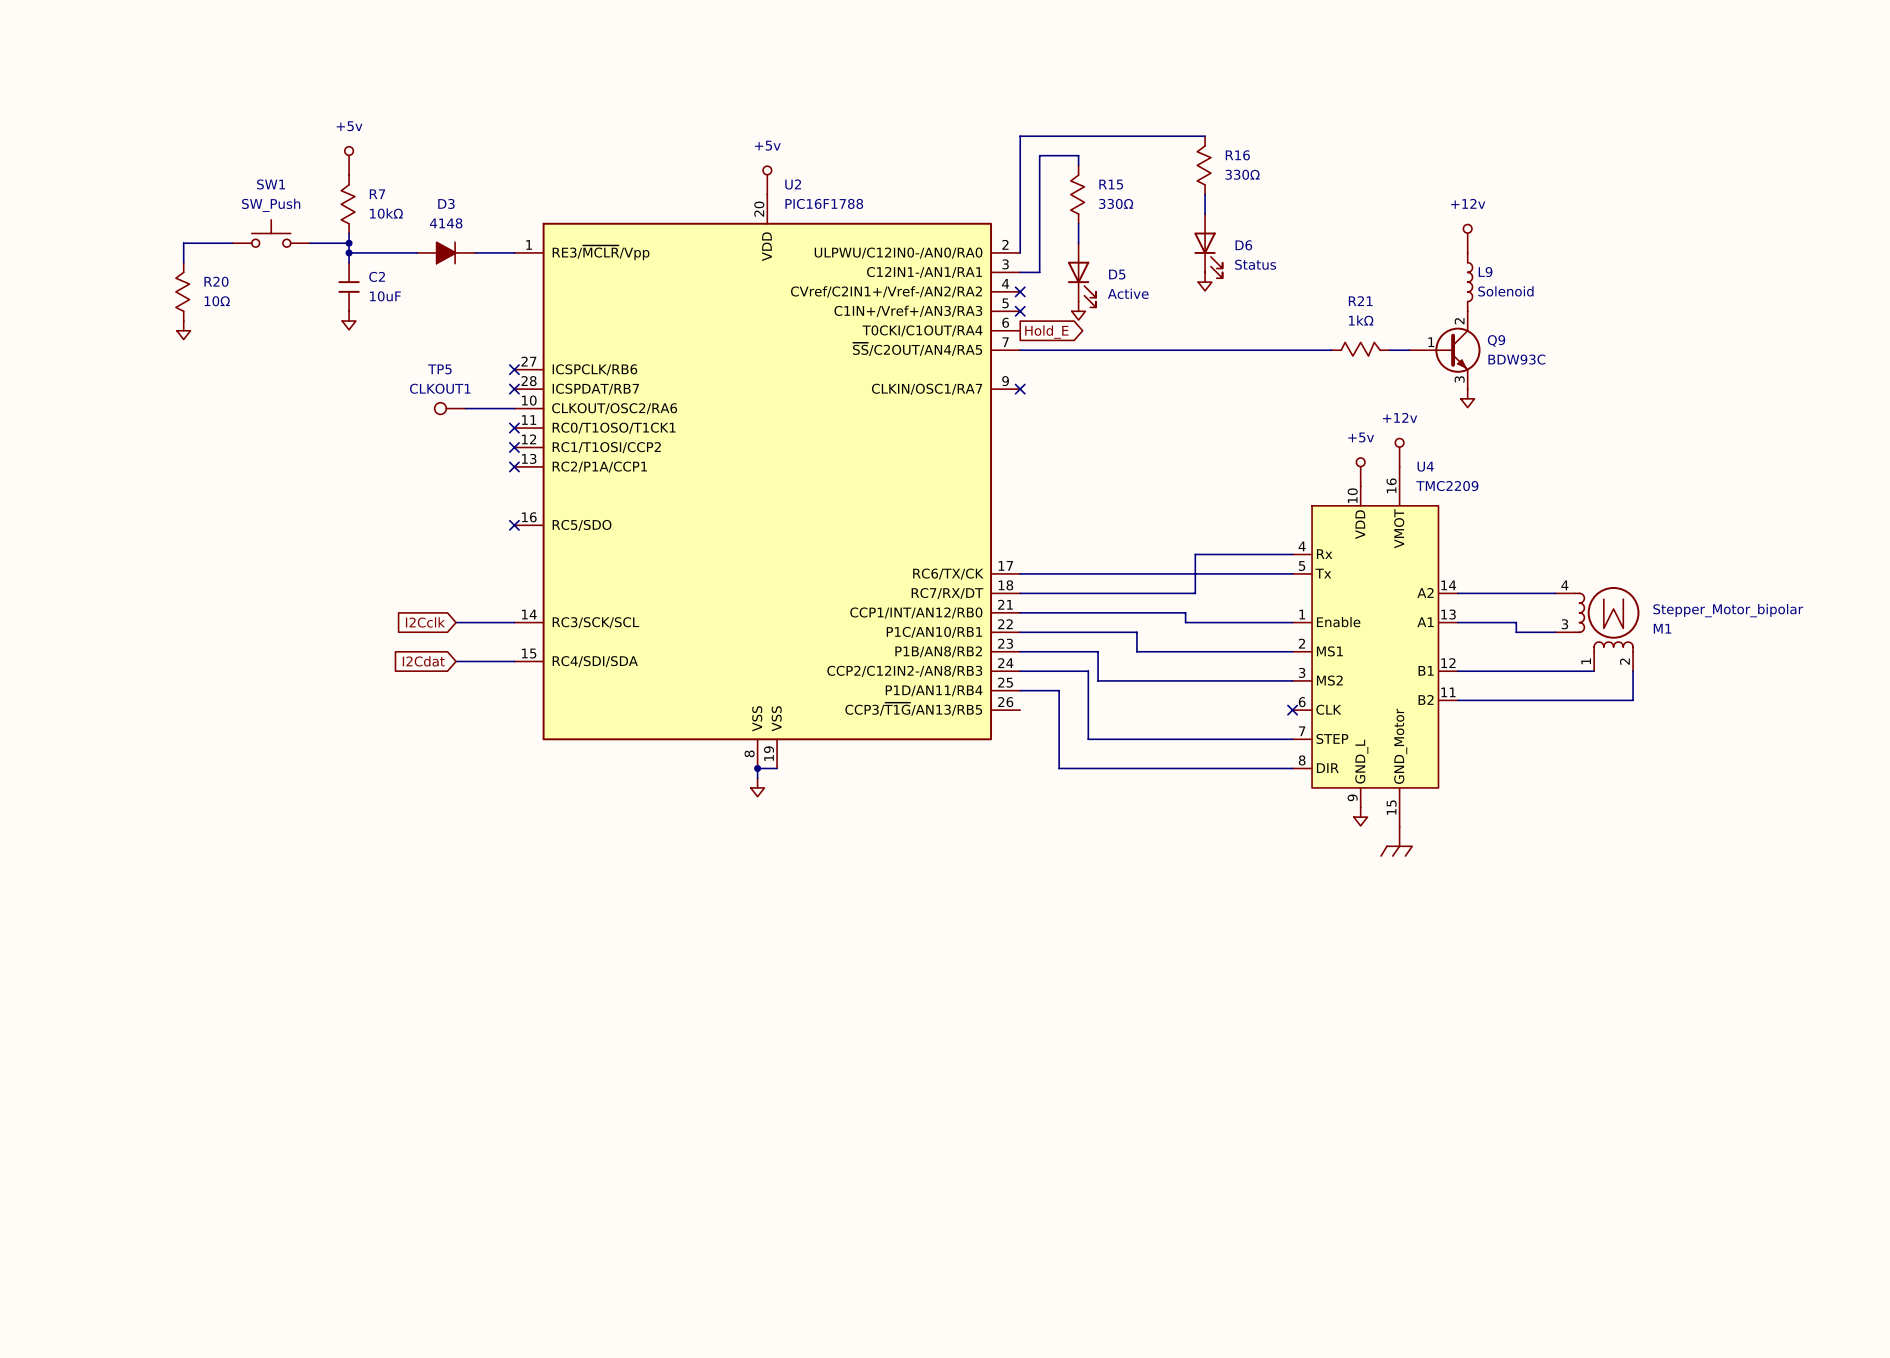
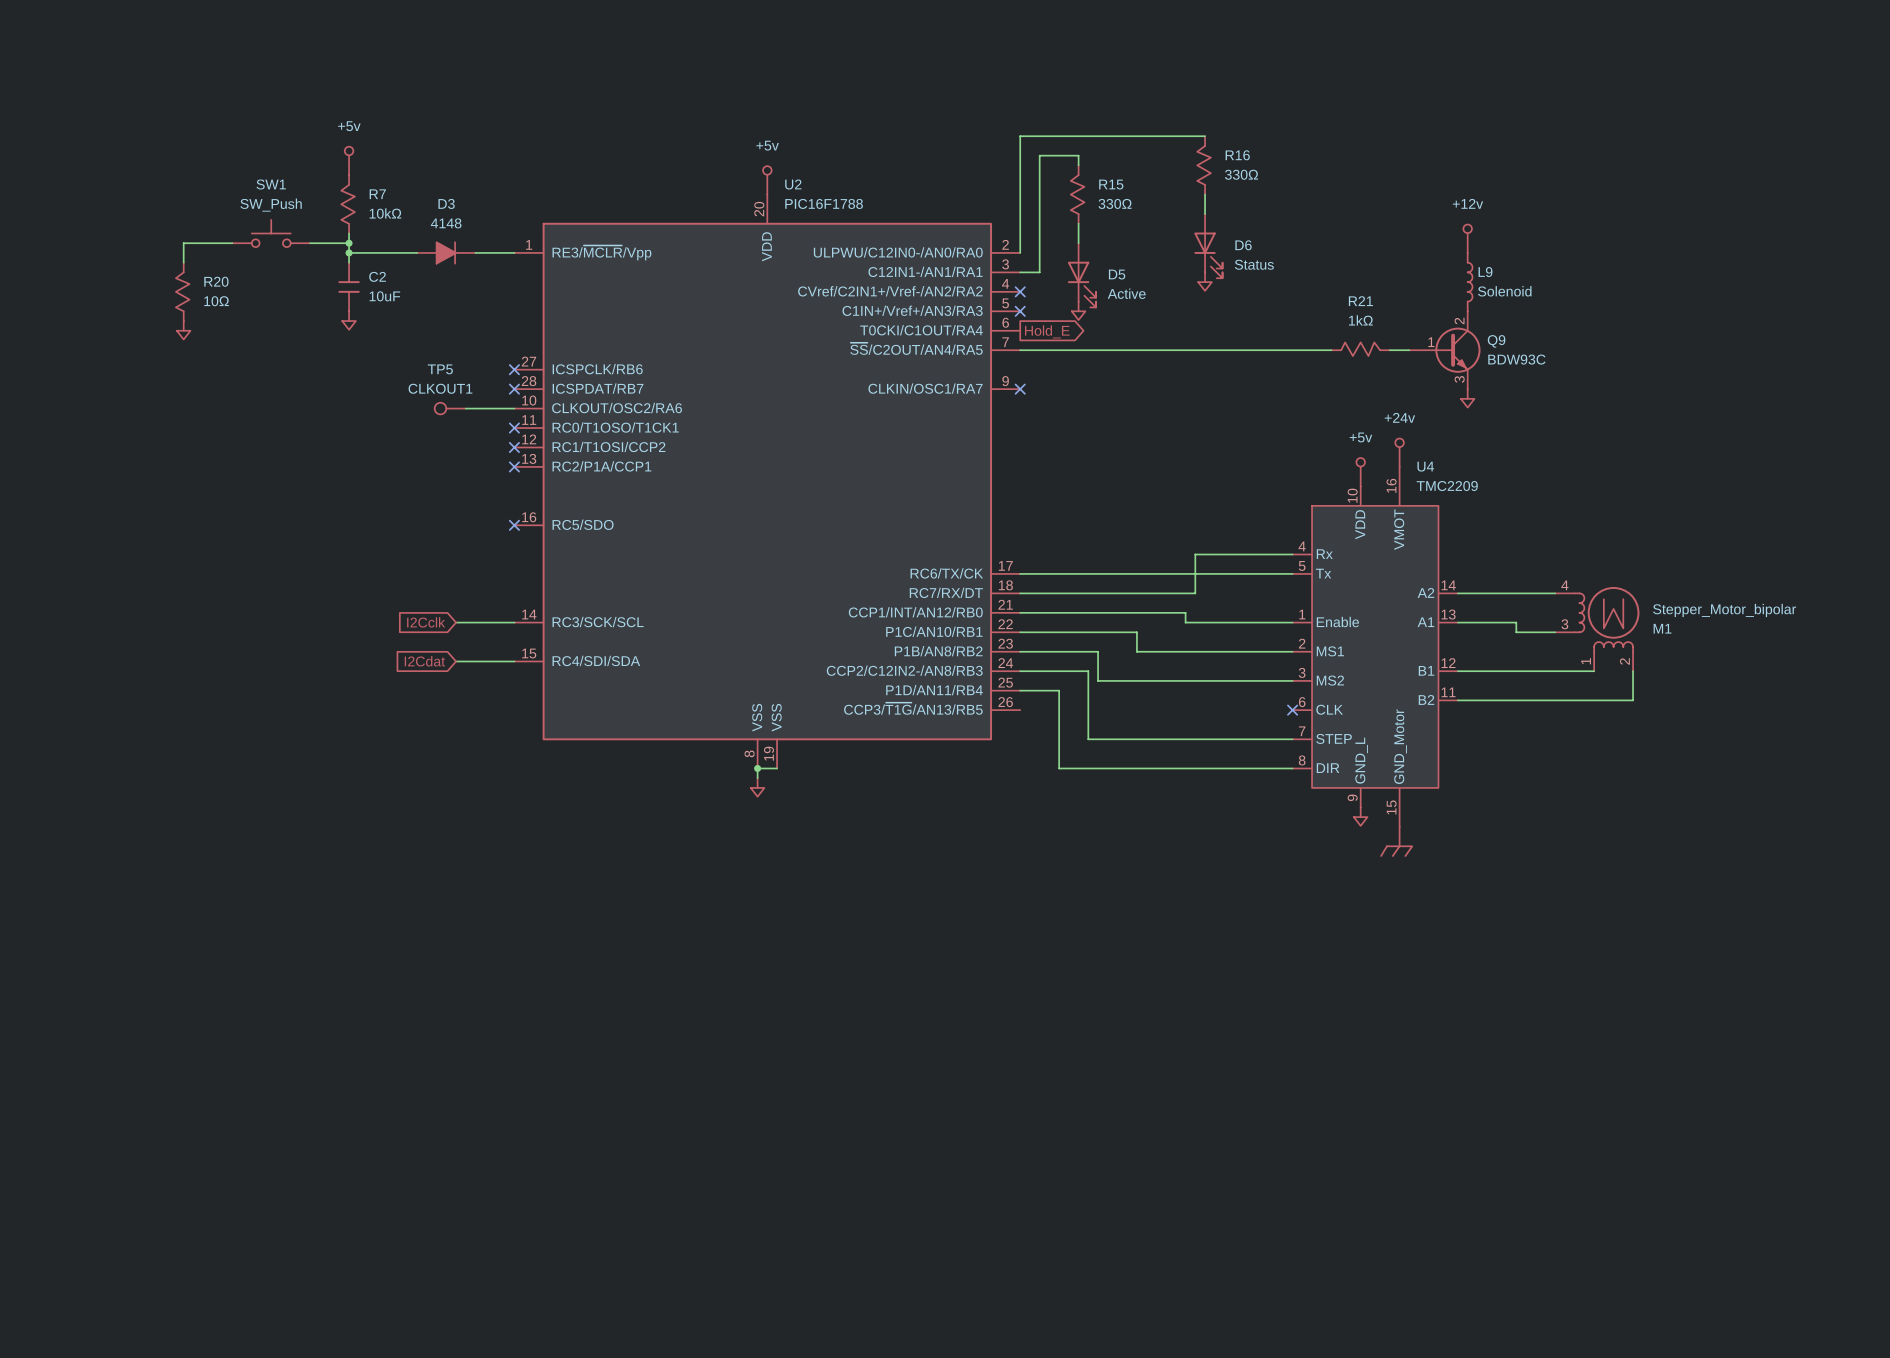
power symbol: +12v (1399, 452) -> +24v (1399, 452)

